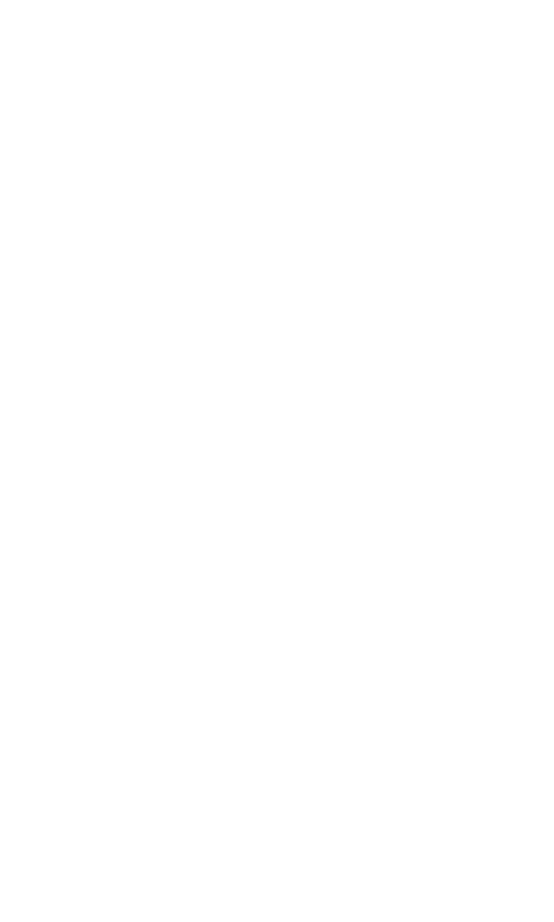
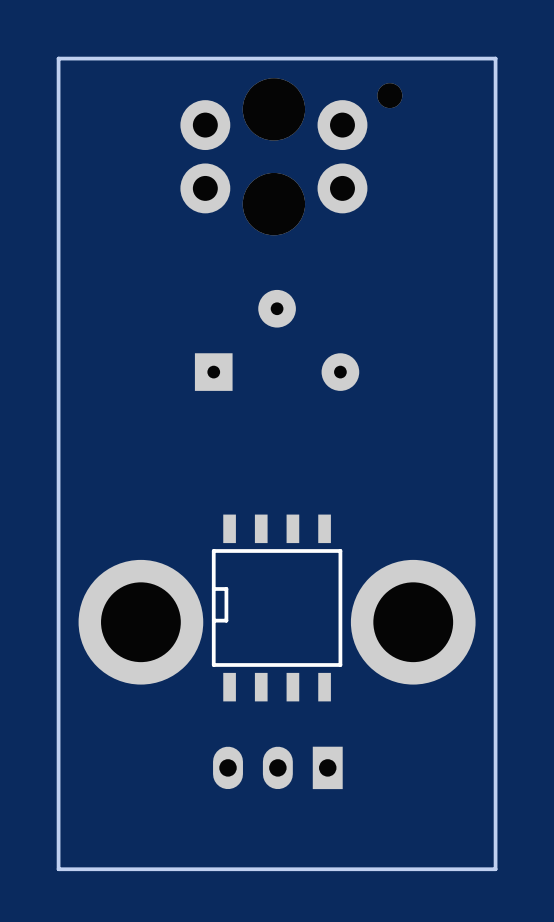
board edge: none -> (495, 58) (495, 869) (58, 869) (58, 58) (495, 58)
part: none -> (291, 156)
part: none -> (277, 340)
part: none -> (277, 607)
part: none -> (140, 622)
part: none -> (413, 622)
part: none -> (277, 767)

